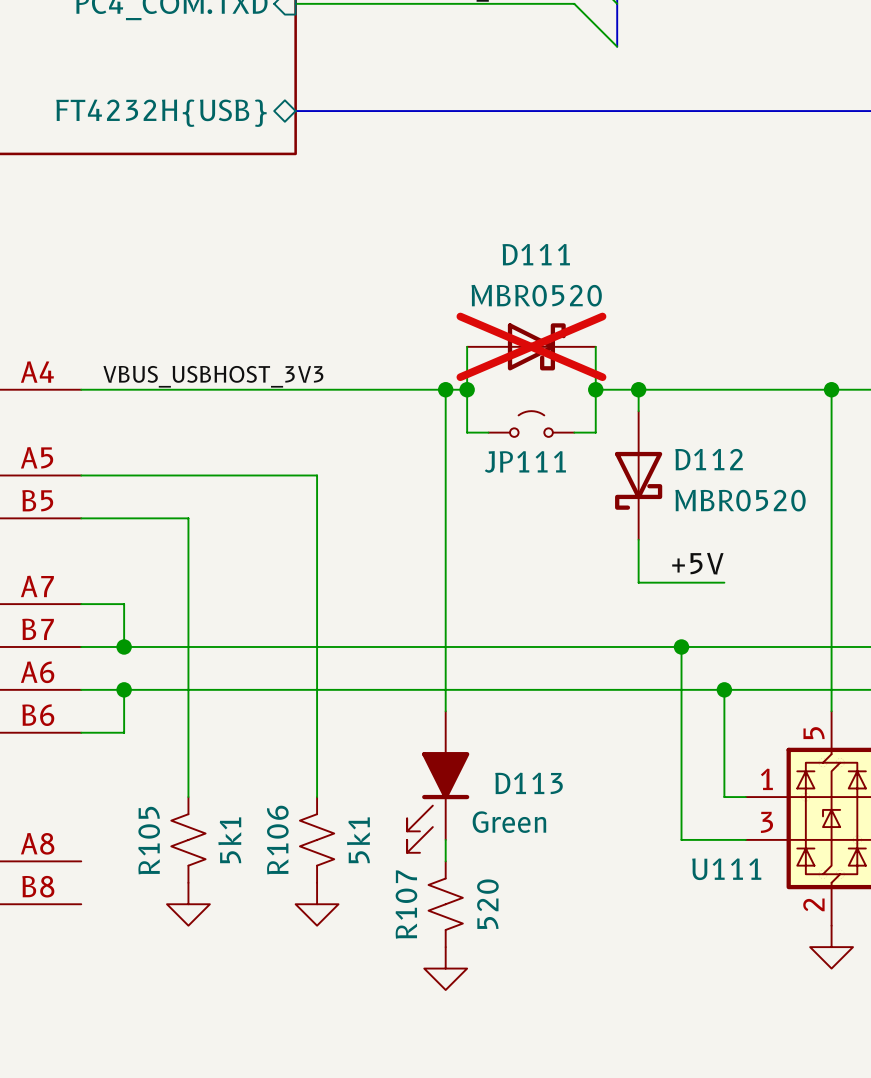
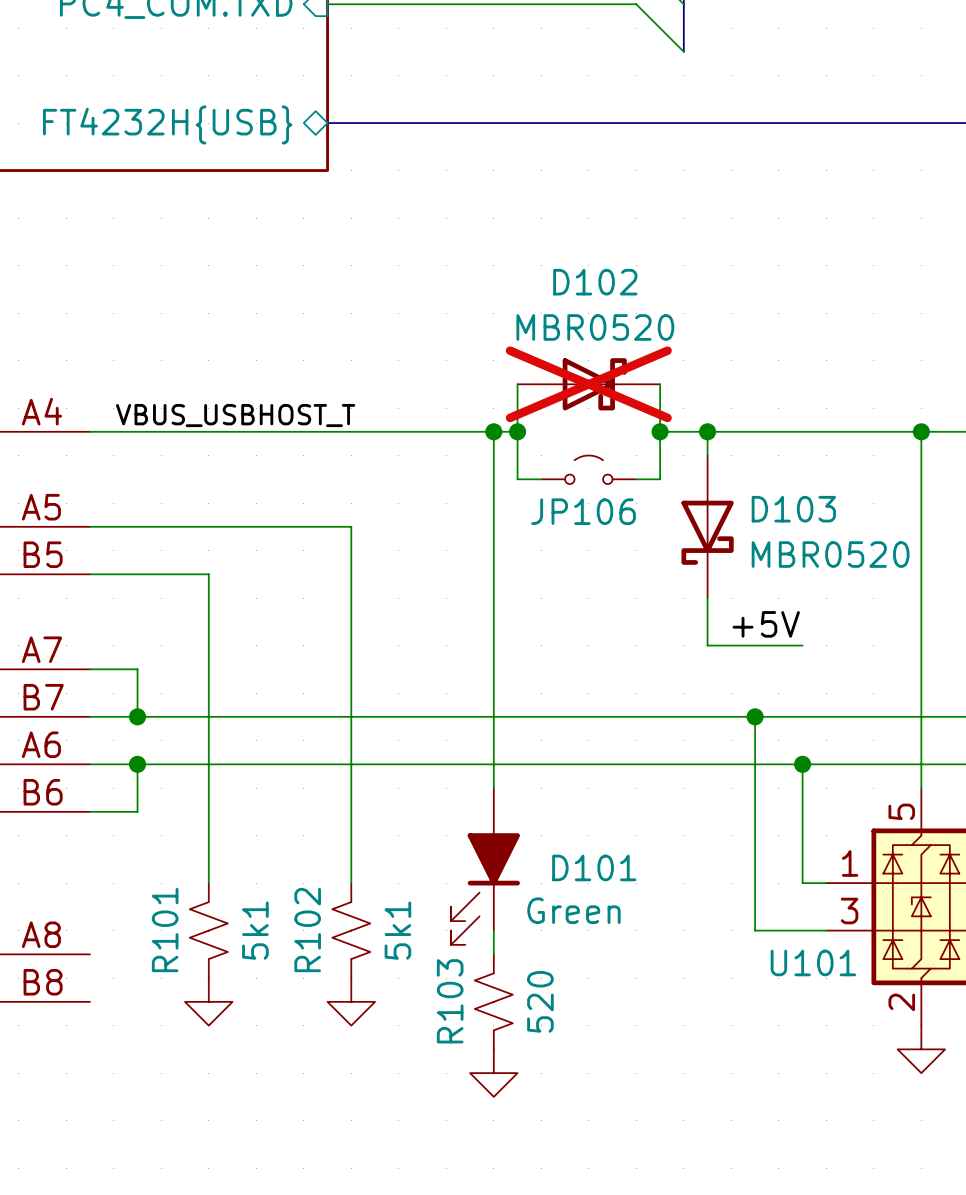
D111 name: D111 (536, 254) -> D102 (595, 282)
label: VBUS_USBHOST_3V3 (213, 376) -> VBUS_USBHOST_T (235, 415)
D112 name: D112 (709, 459) -> D103 (793, 509)
JP111 name: JP111 (525, 461) -> JP106 (583, 511)
D113 name: D113 (529, 783) -> D101 (594, 867)
R105 name: R105 (149, 840) -> R101 (165, 930)
R106 name: R106 (277, 840) -> R102 (307, 930)
U111 name: U111 (726, 869) -> U101 (813, 962)
R107 name: R107 (406, 904) -> R103 (450, 1001)

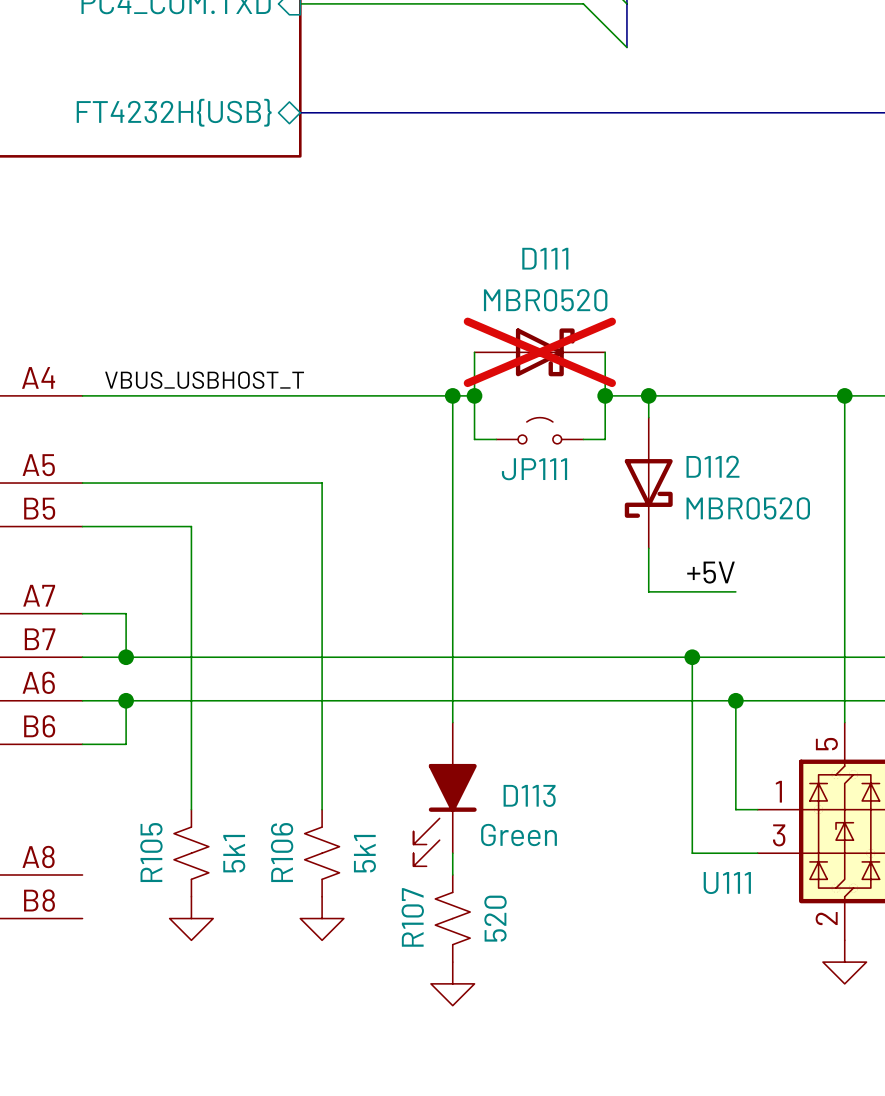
D102 name: D102 (595, 282) -> D111 (545, 258)
D103 name: D103 (793, 509) -> D112 (712, 466)
JP106 name: JP106 (583, 511) -> JP111 (534, 469)
D101 name: D101 (594, 867) -> D113 (529, 795)
R101 name: R101 (165, 930) -> R105 (151, 852)
R102 name: R102 (307, 930) -> R106 (282, 852)
U101 name: U101 (813, 962) -> U111 (727, 883)
R103 name: R103 (450, 1001) -> R107 (412, 917)

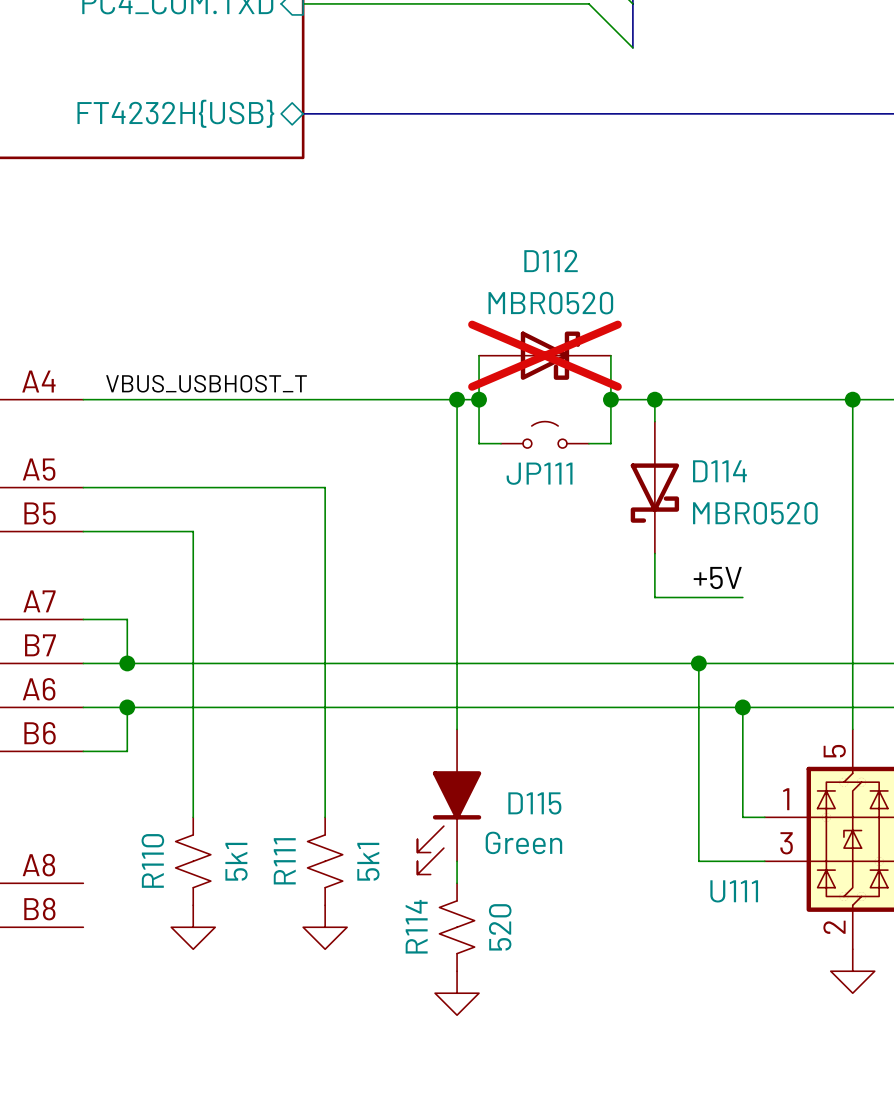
D111 name: D111 (545, 258) -> D112 (551, 261)
D112 name: D112 (712, 466) -> D114 (719, 471)
D113 name: D113 (529, 795) -> D115 (534, 803)
R105 name: R105 (151, 852) -> R110 (152, 860)
R106 name: R106 (282, 852) -> R111 (284, 861)
R107 name: R107 (412, 917) -> R114 (416, 926)

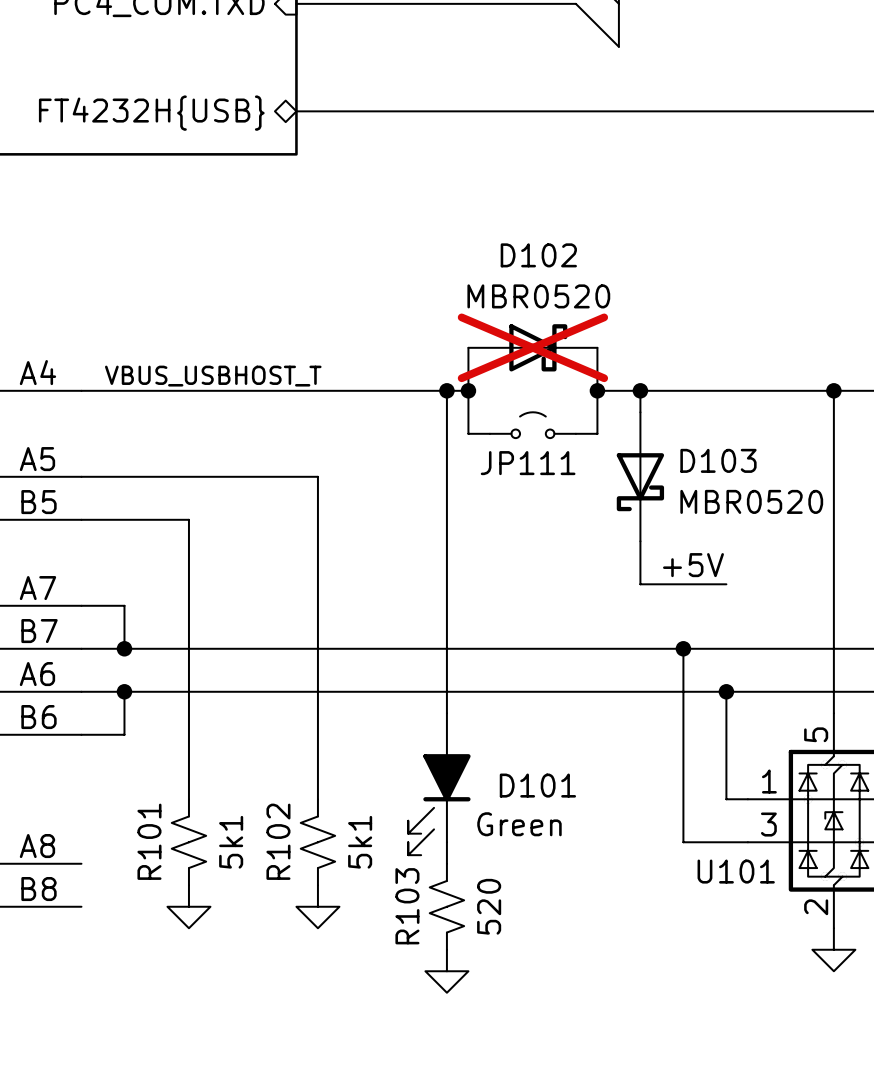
D112 name: D112 (551, 261) -> D102 (538, 255)
D114 name: D114 (719, 471) -> D103 (718, 460)
D115 name: D115 (534, 803) -> D101 (537, 785)
R110 name: R110 (152, 860) -> R101 (149, 841)
R111 name: R111 (284, 861) -> R102 (278, 841)
U111 name: U111 (734, 891) -> U101 (736, 871)
R114 name: R114 (416, 926) -> R103 (407, 906)

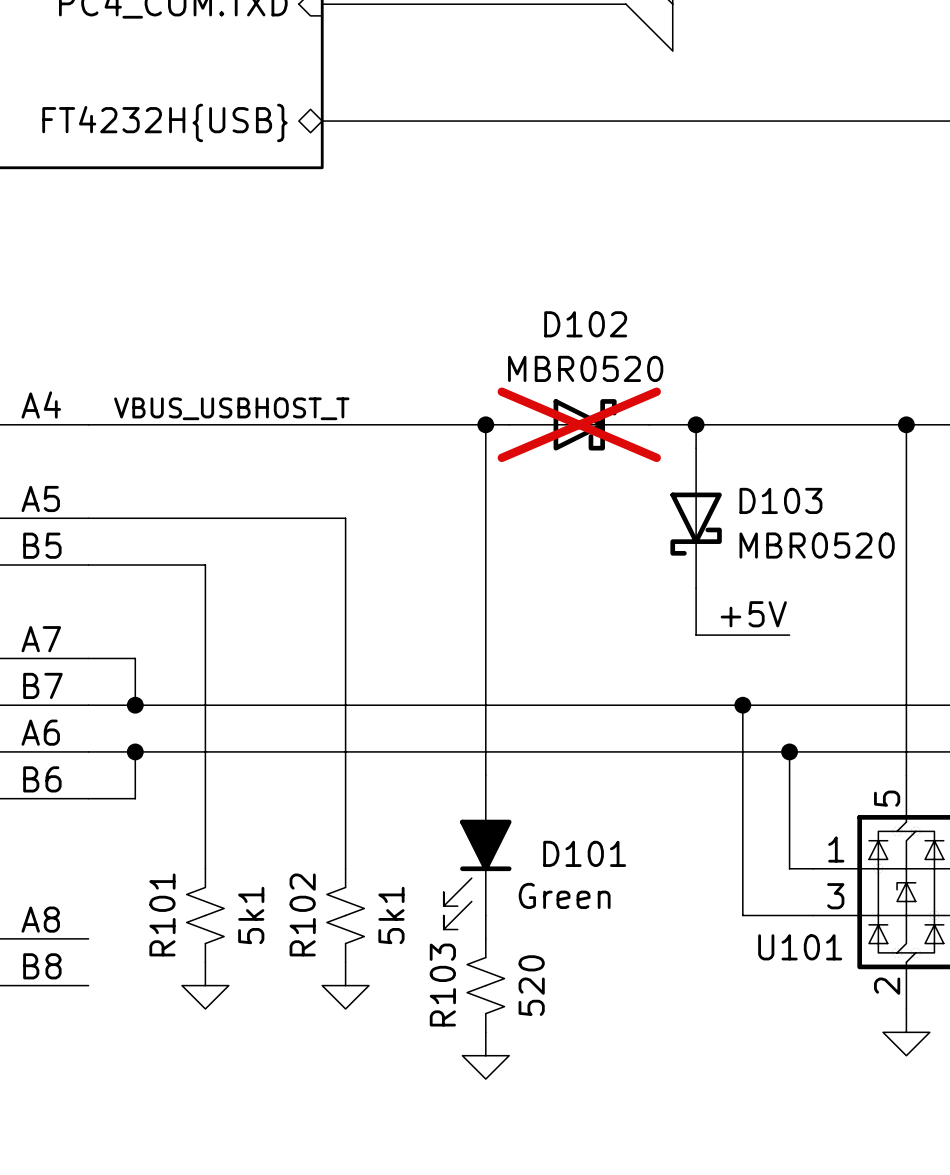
wire: (468, 347) (468, 433) (489, 433) -> none
D102 position: (532, 347) -> (579, 424)
wire: (597, 347) (597, 433) (575, 433) -> none
junction: (468, 390) -> none
junction: (597, 390) -> none
JP111: (532, 425) -> none

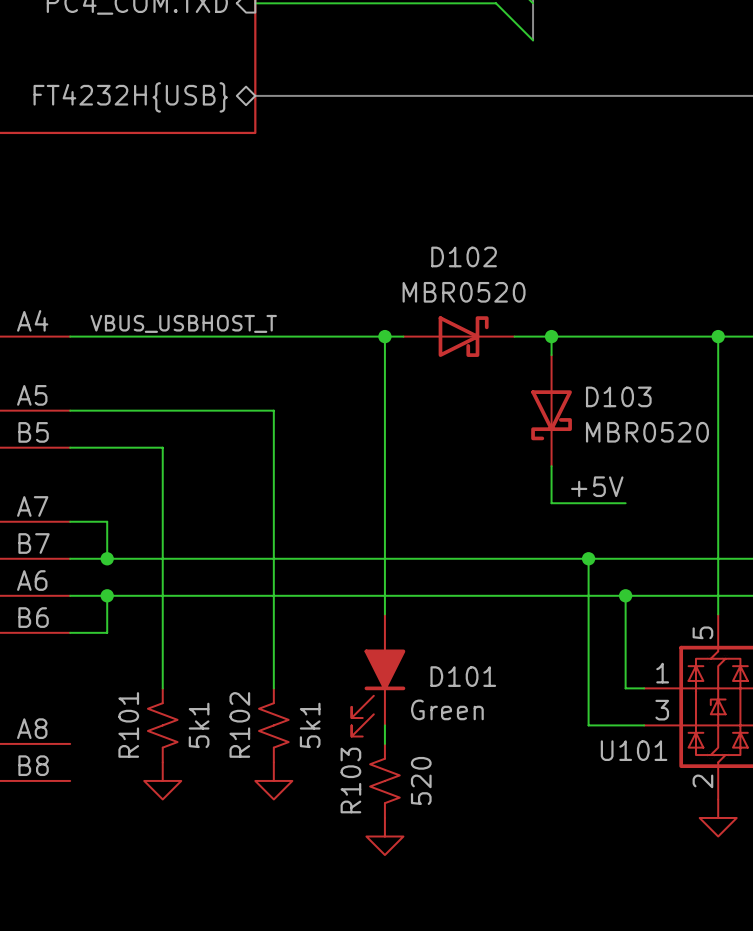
D102 do-not-place cross: (579, 424) -> none

